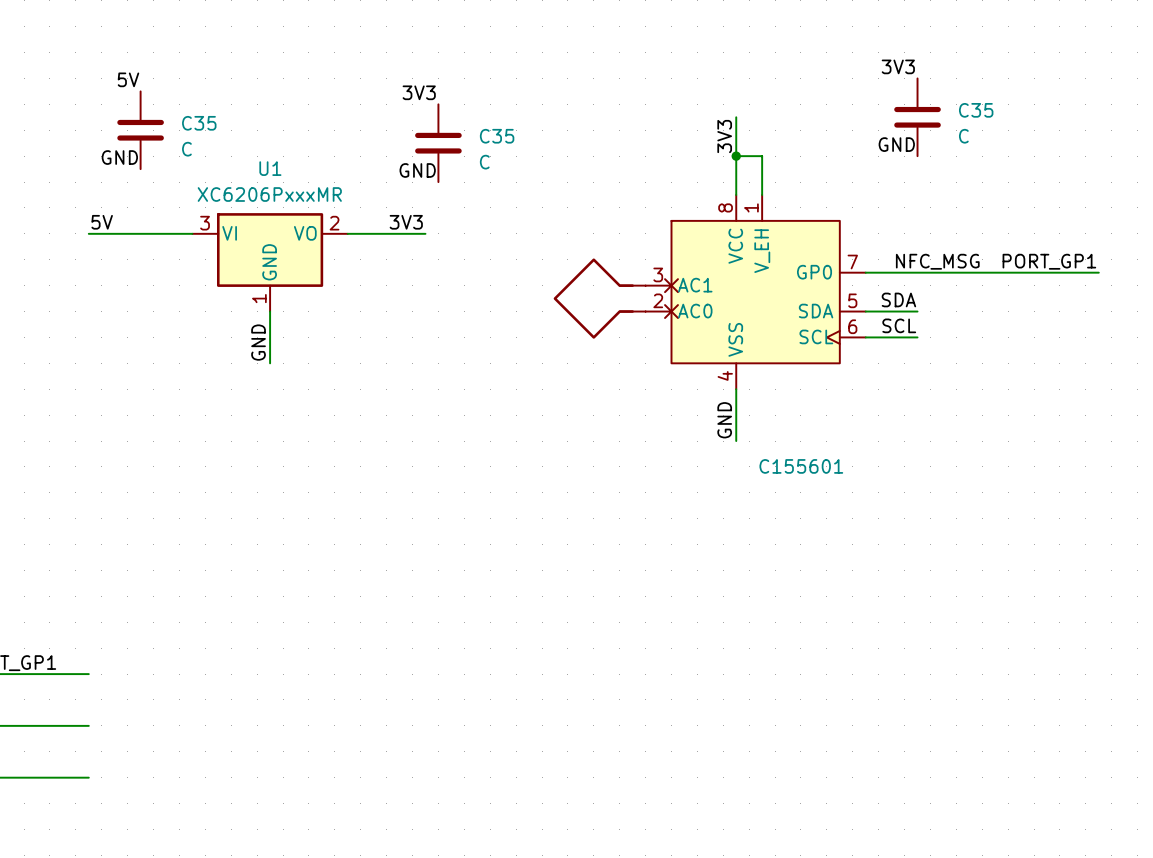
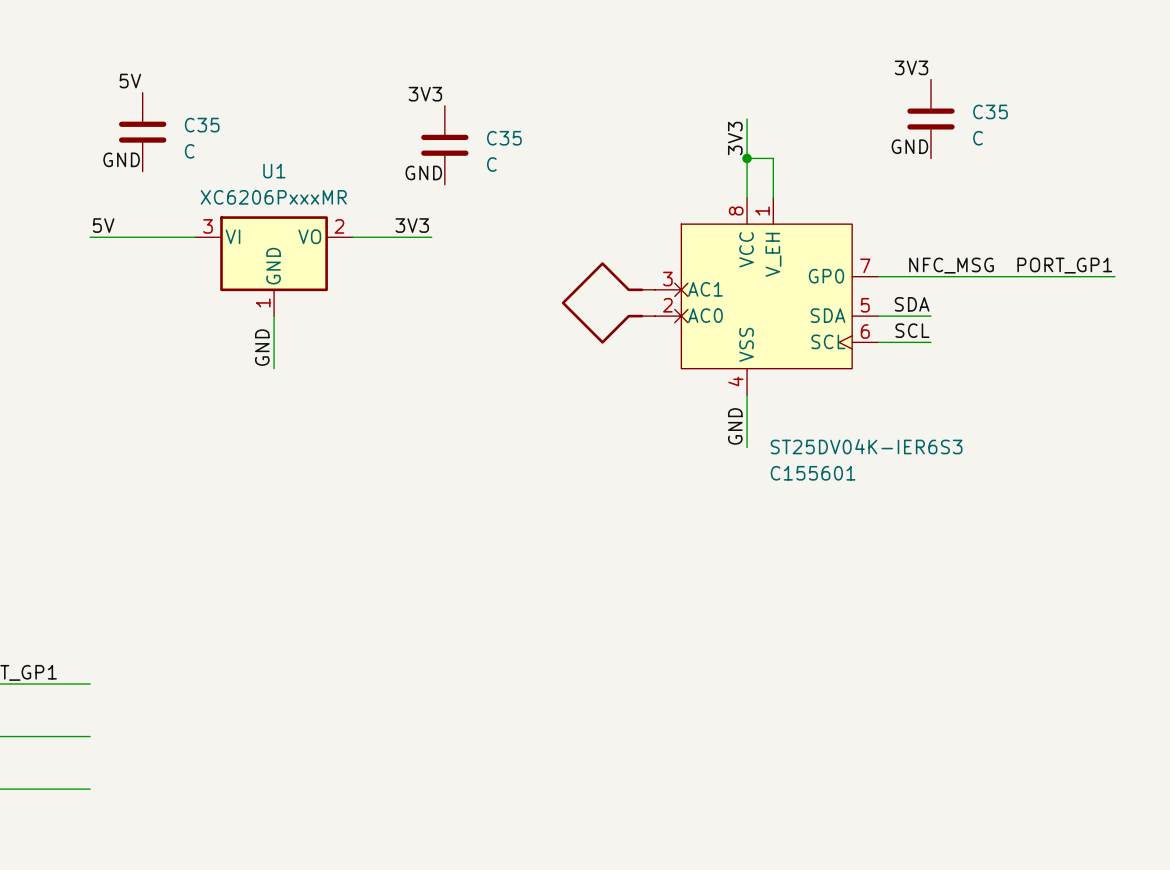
part text: none -> ST25DV04K-IER6S3 (866, 446)

